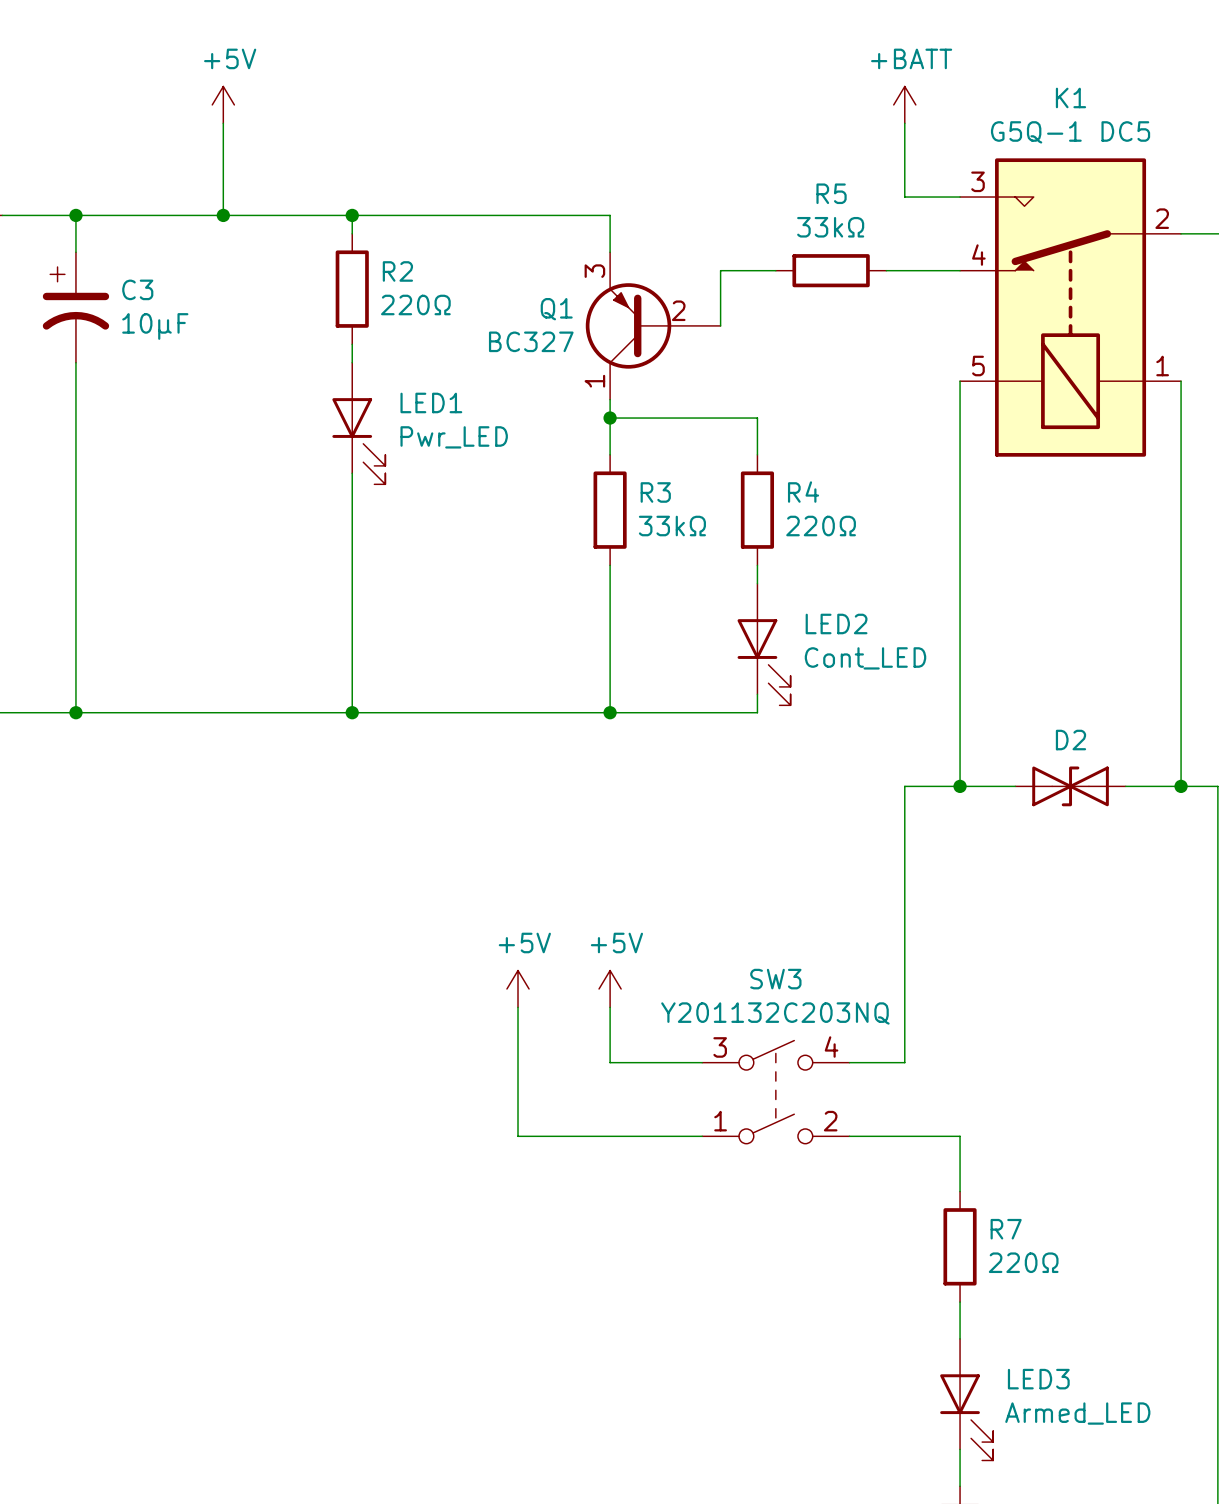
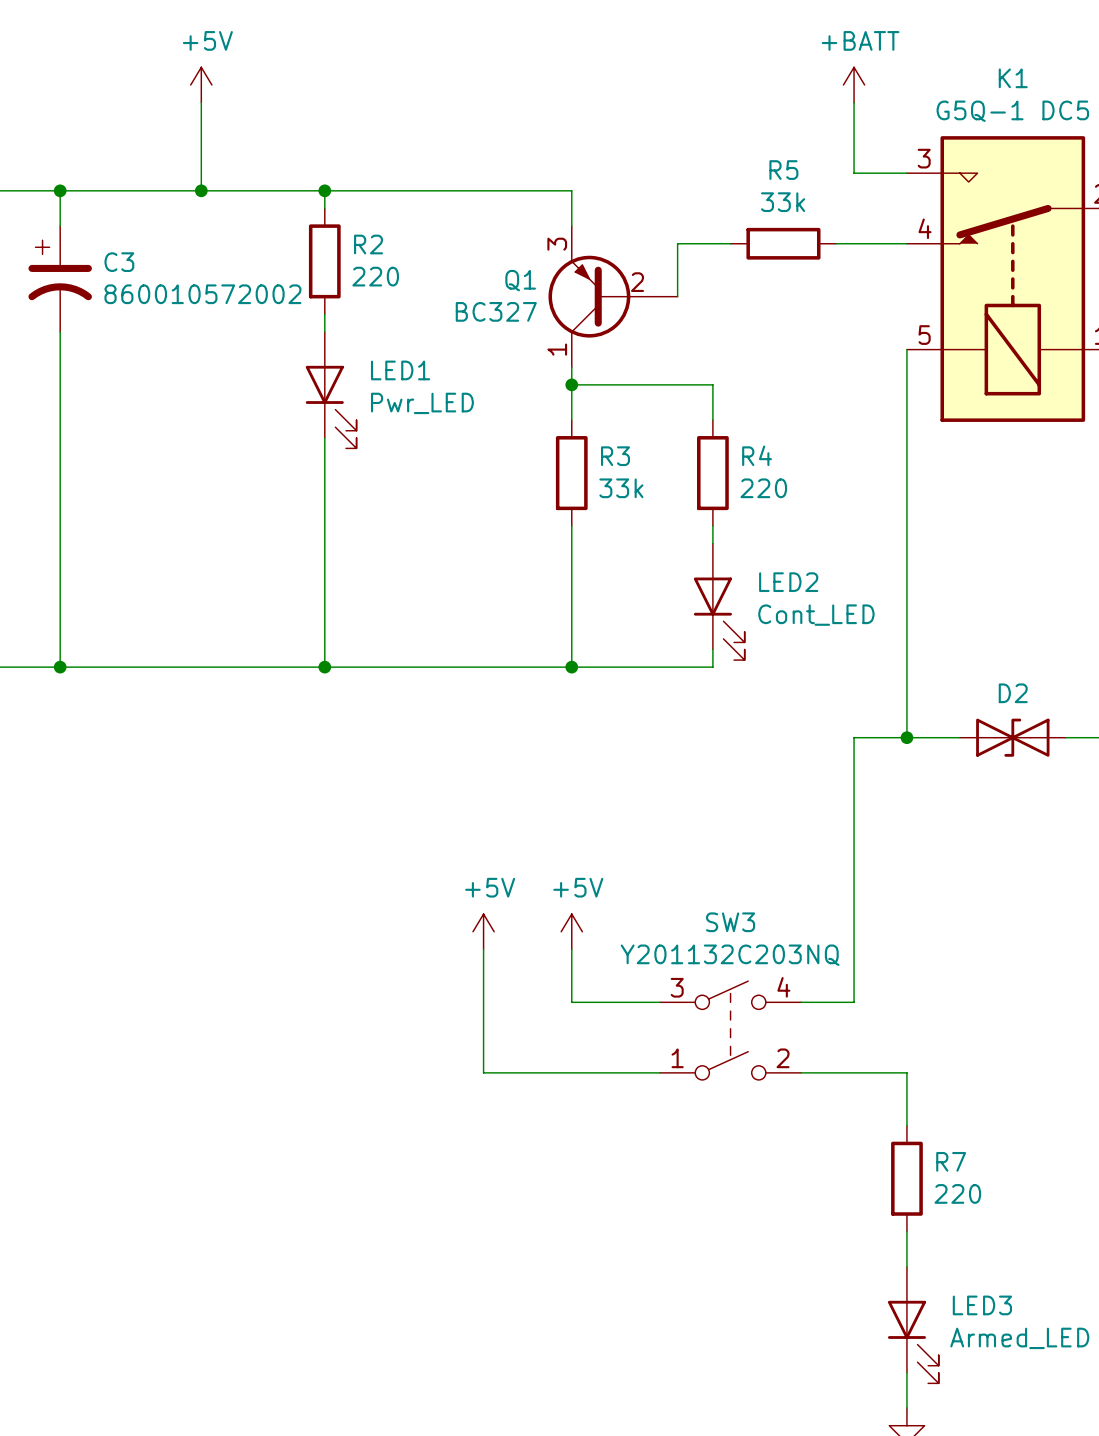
R5 value: 33kΩ (830, 227) -> 33k (783, 202)
R2 value: 220Ω (415, 304) -> 220 (375, 276)
C3 value: 10µF (155, 326) -> 860010572002 (202, 294)
R3 value: 33kΩ (672, 526) -> 33k (621, 488)
R4 value: 220Ω (821, 526) -> 220 (763, 488)
R7 value: 220Ω (1023, 1262) -> 220 (957, 1193)

